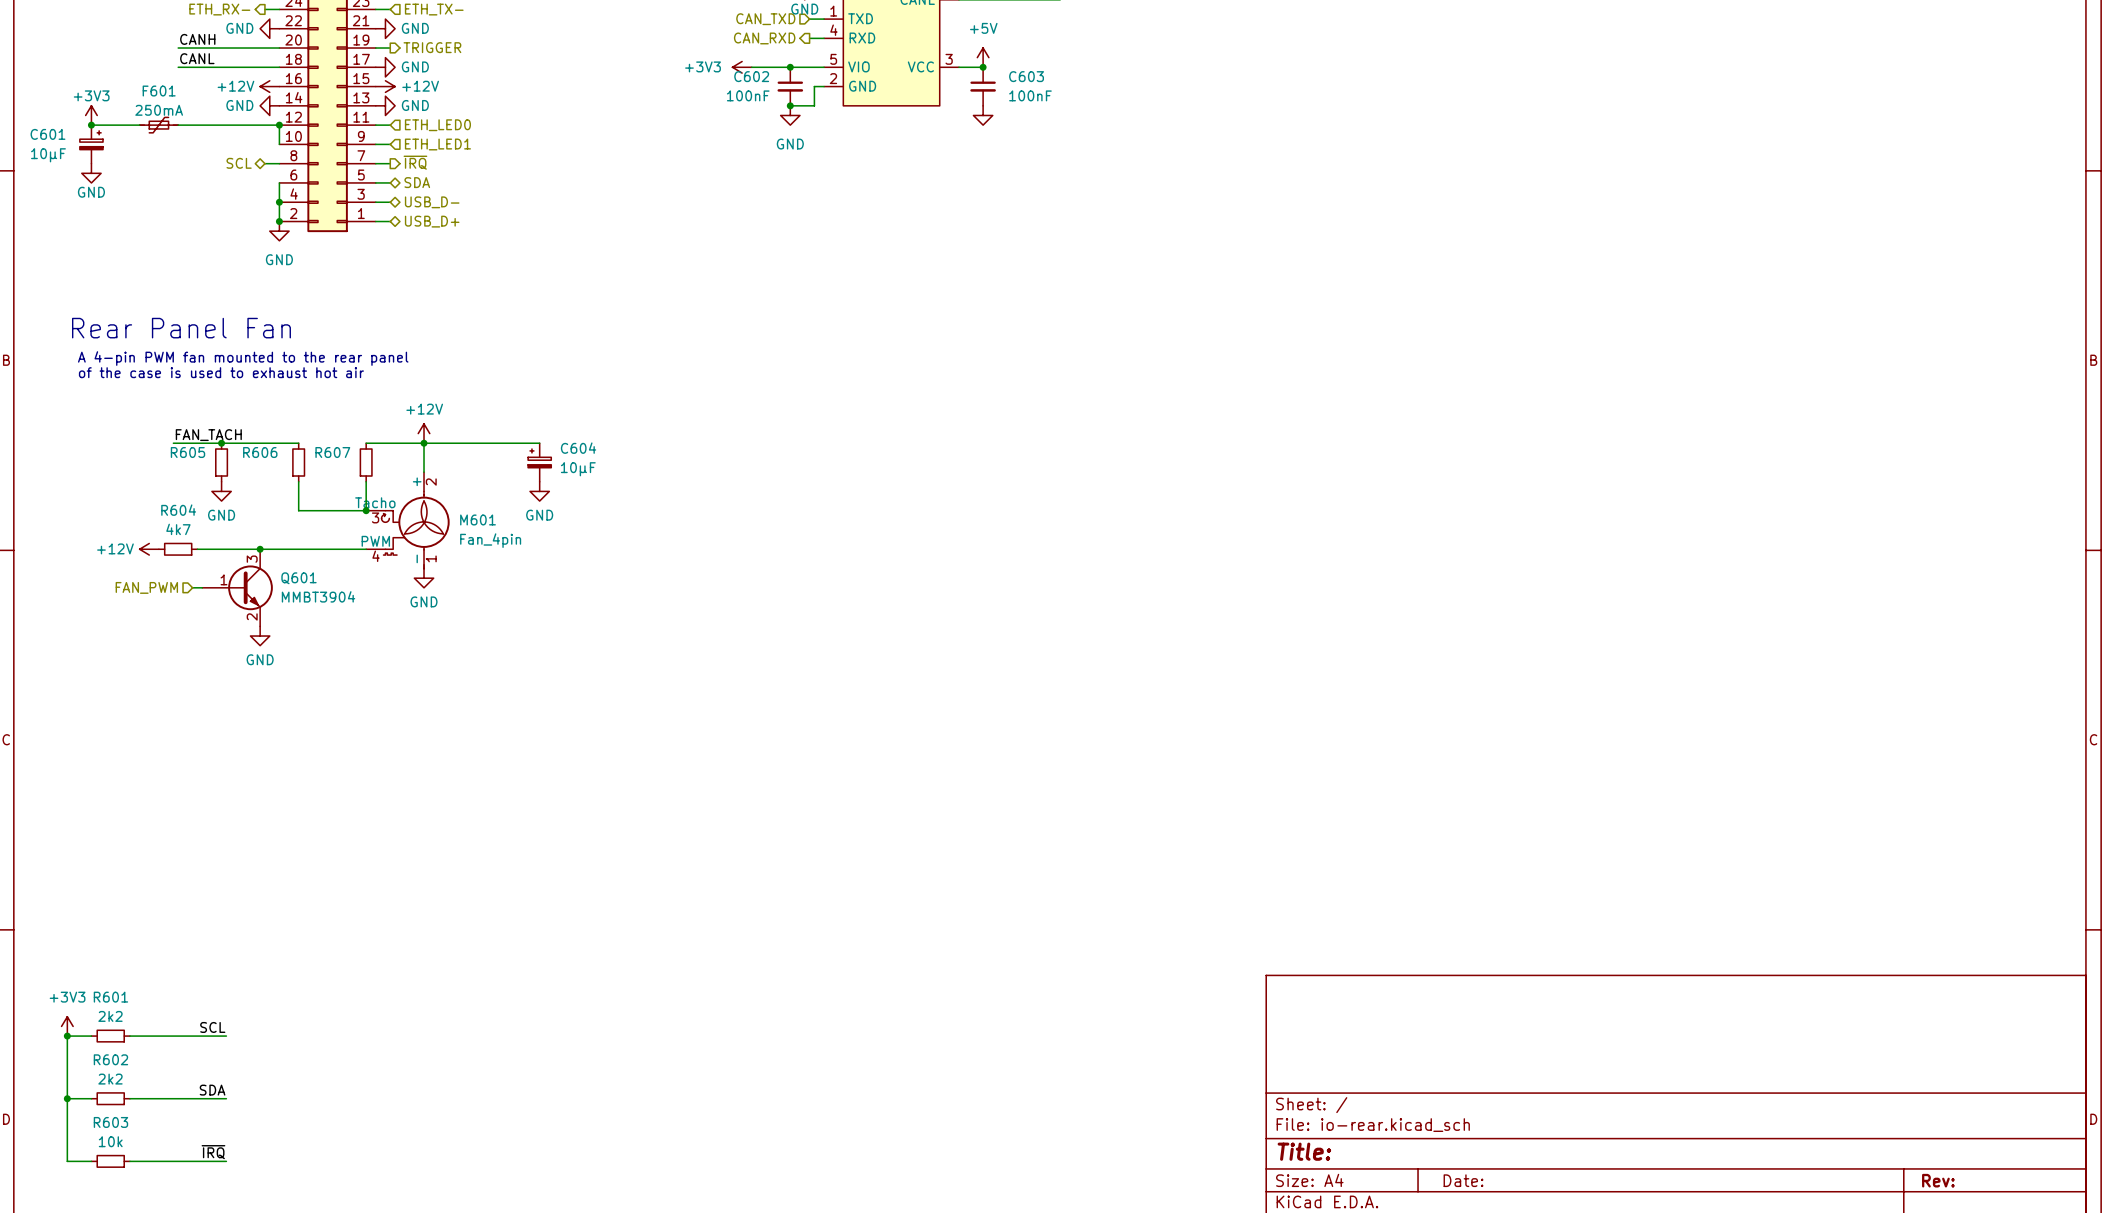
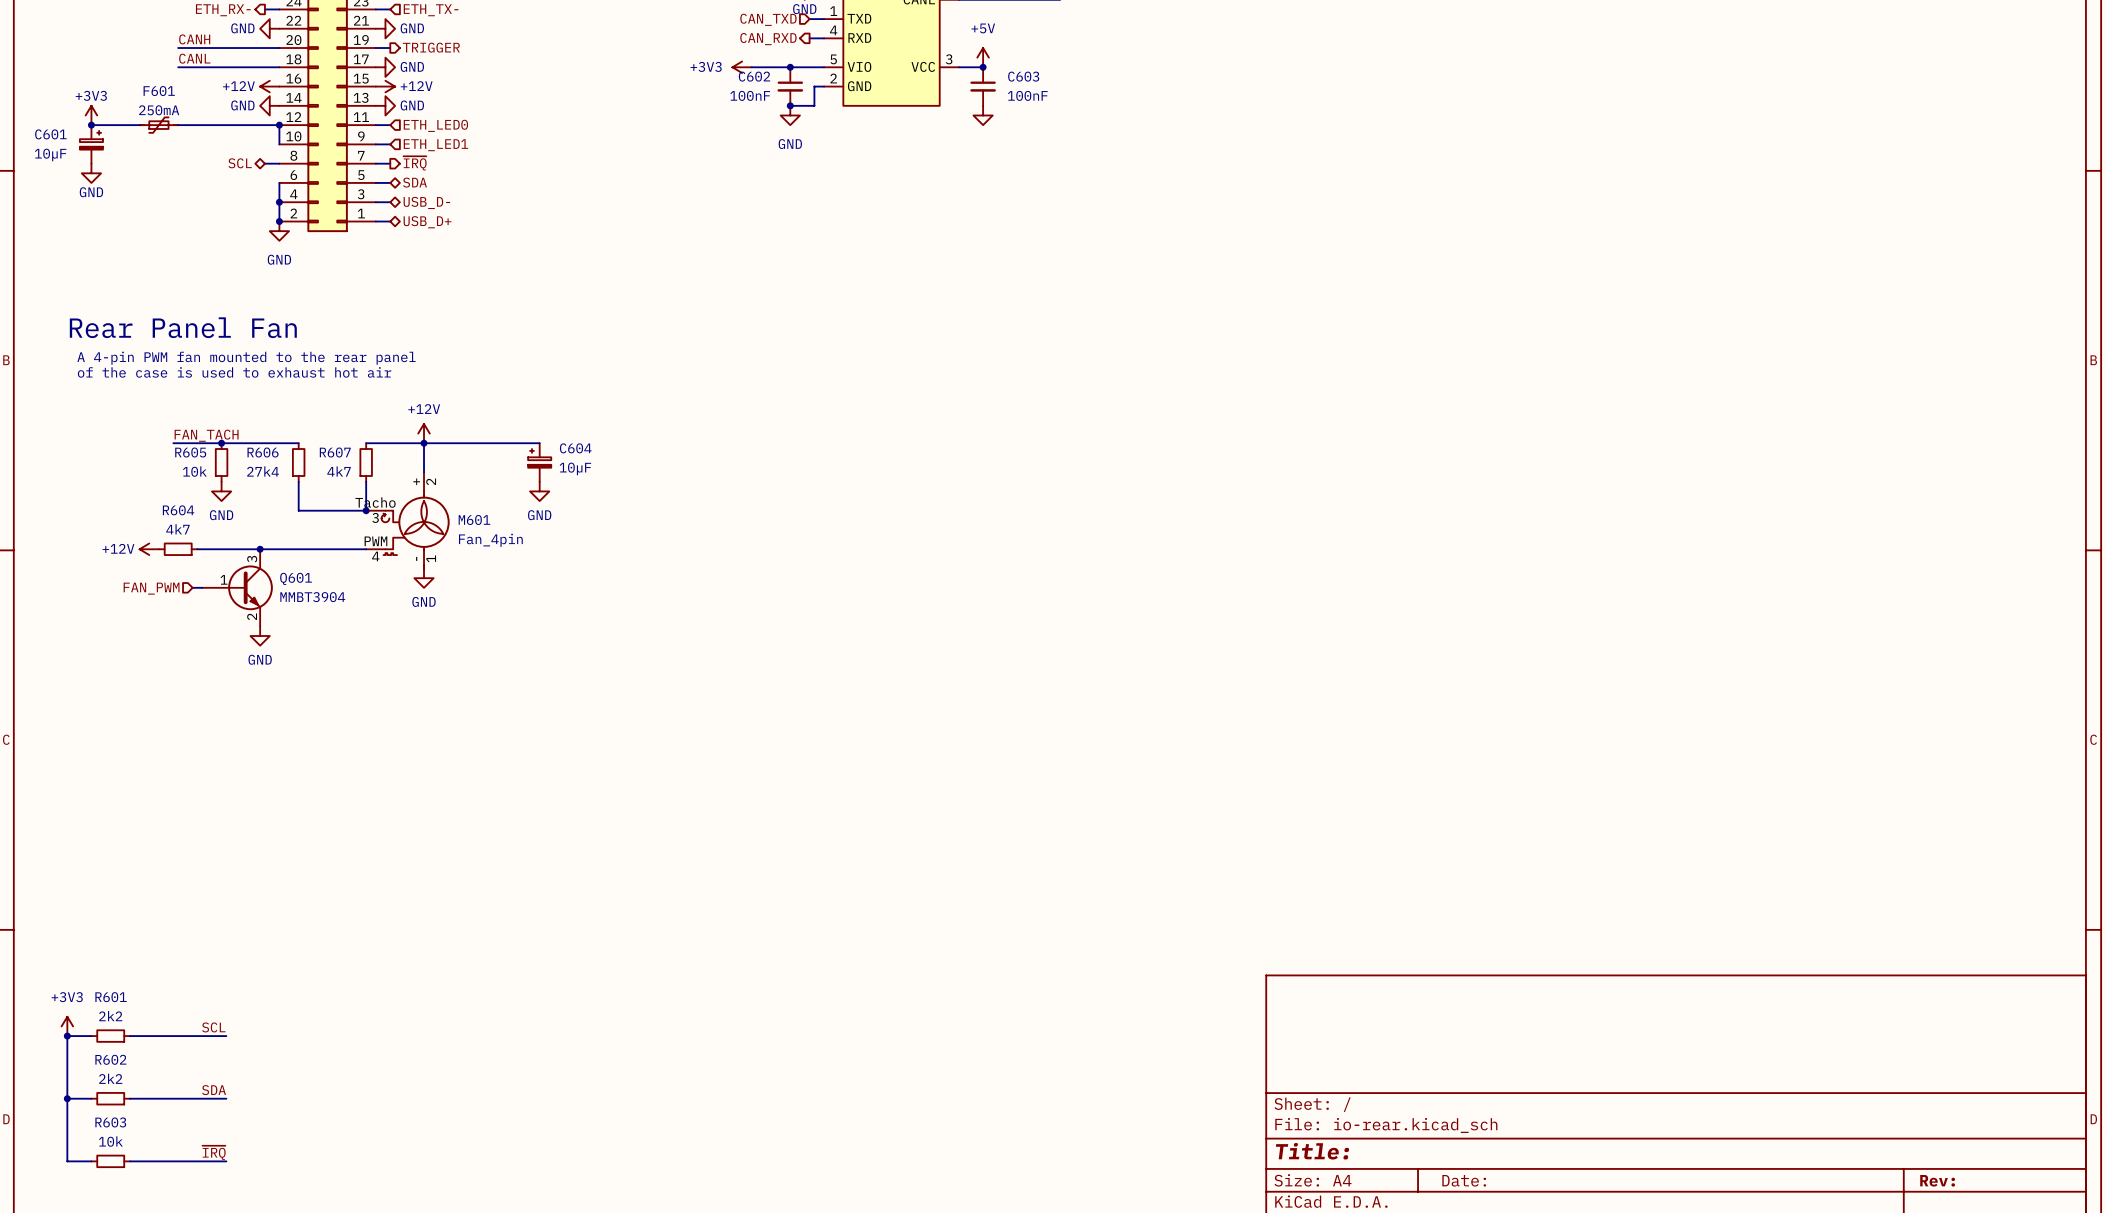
R605 value: none -> 10k (194, 471)
R606 value: none -> 27k4 (263, 471)
R607 value: none -> 4k7 (339, 471)

